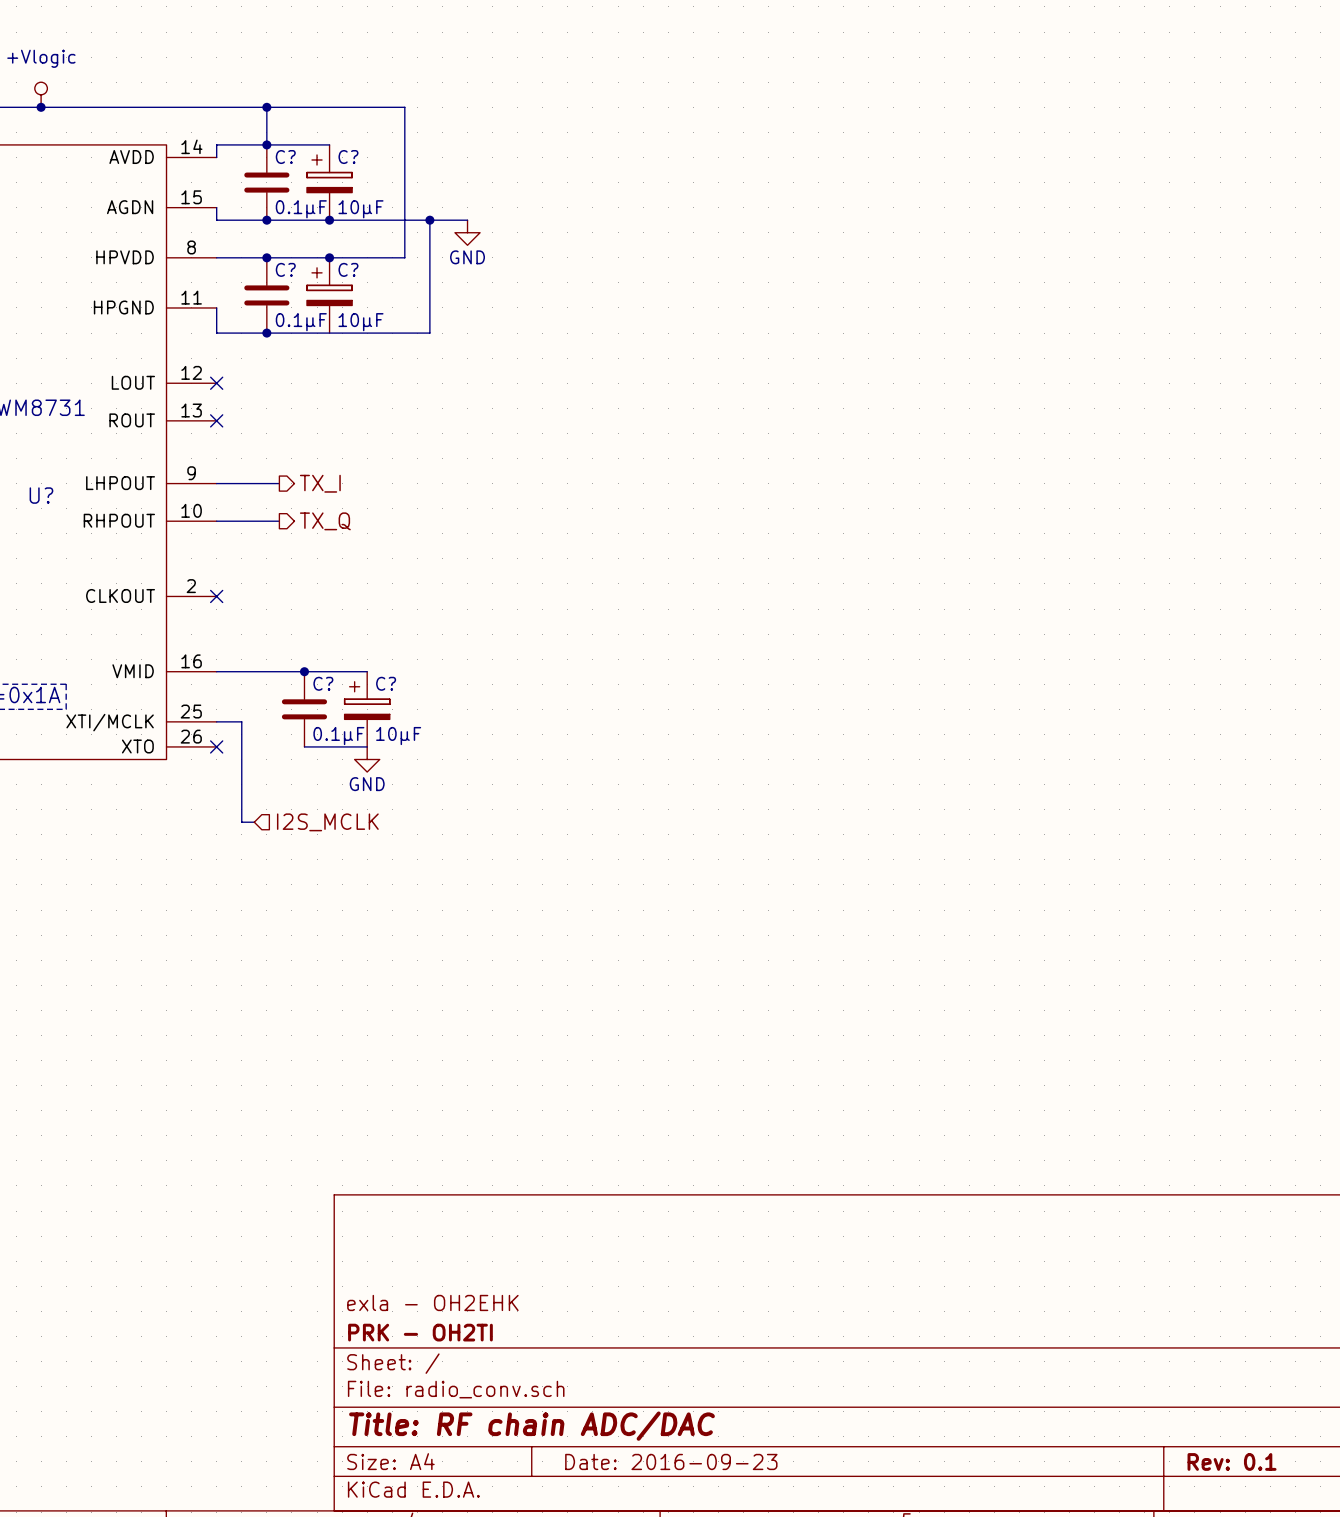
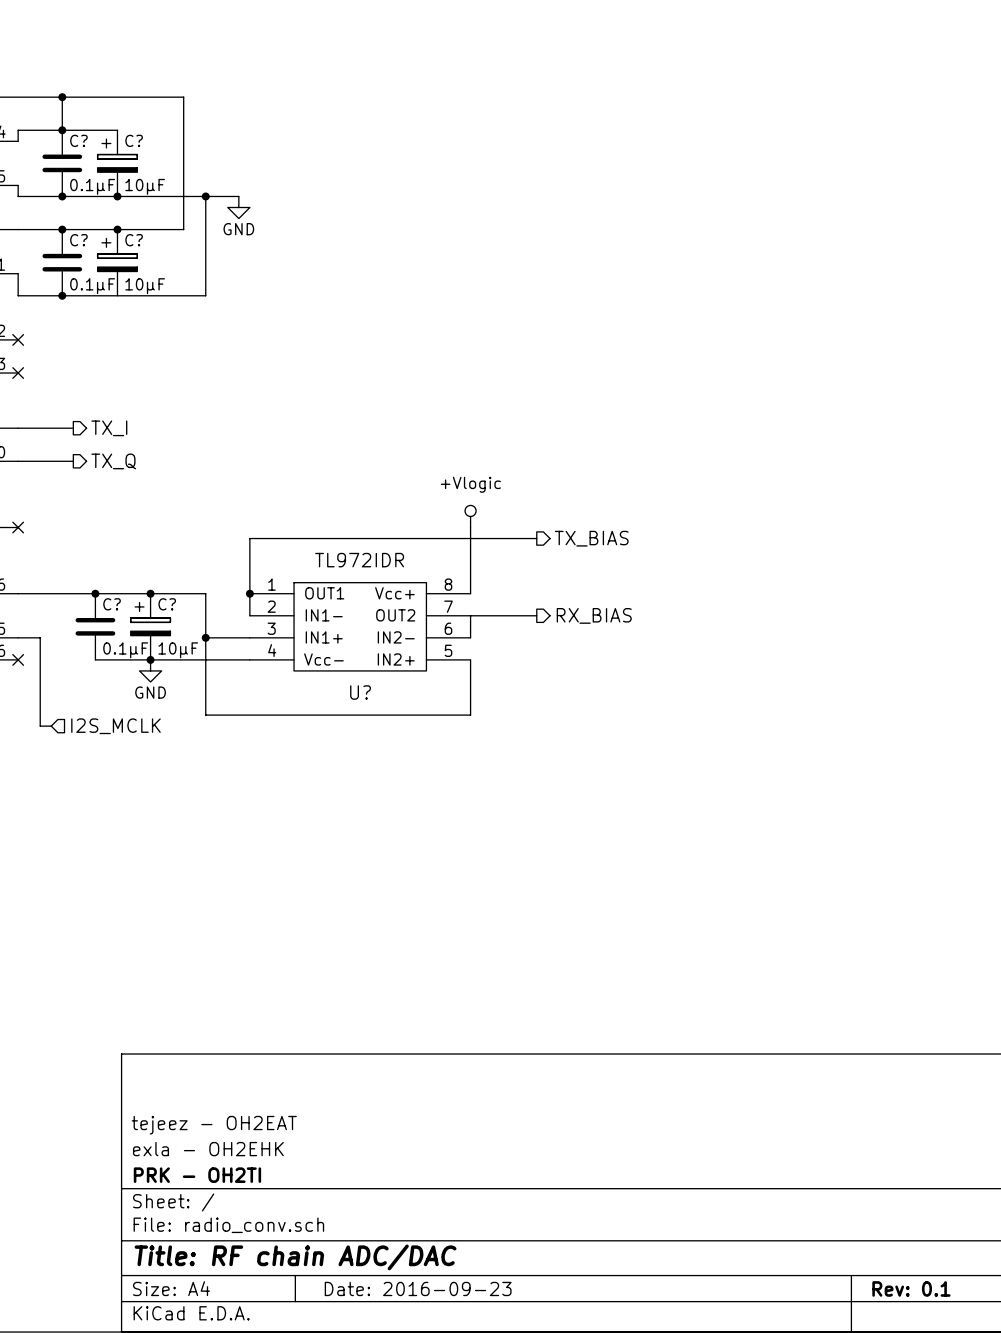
power symbol: none -> +Vlogic (470, 516)
wire: none -> (470, 527) (470, 593)
wire: none -> (536, 538) (249, 538) (249, 615)
hierarchical label: none -> TX_BIAS (591, 538)
wire: none -> (150, 593) (205, 593) (205, 715) (470, 715) (470, 659)
junction: none -> (150, 593)
junction: none -> (249, 593)
wire: none -> (536, 615) (470, 615) (470, 637)
hierarchical label: none -> RX_BIAS (594, 615)
U?: none -> TL972IDR (360, 626)
wire: none -> (205, 637) (249, 637)
junction: none -> (205, 637)
wire: none -> (150, 659) (249, 659)
junction: none -> (150, 659)
title block: none -> tejeez - OH2EAT (214, 1125)

